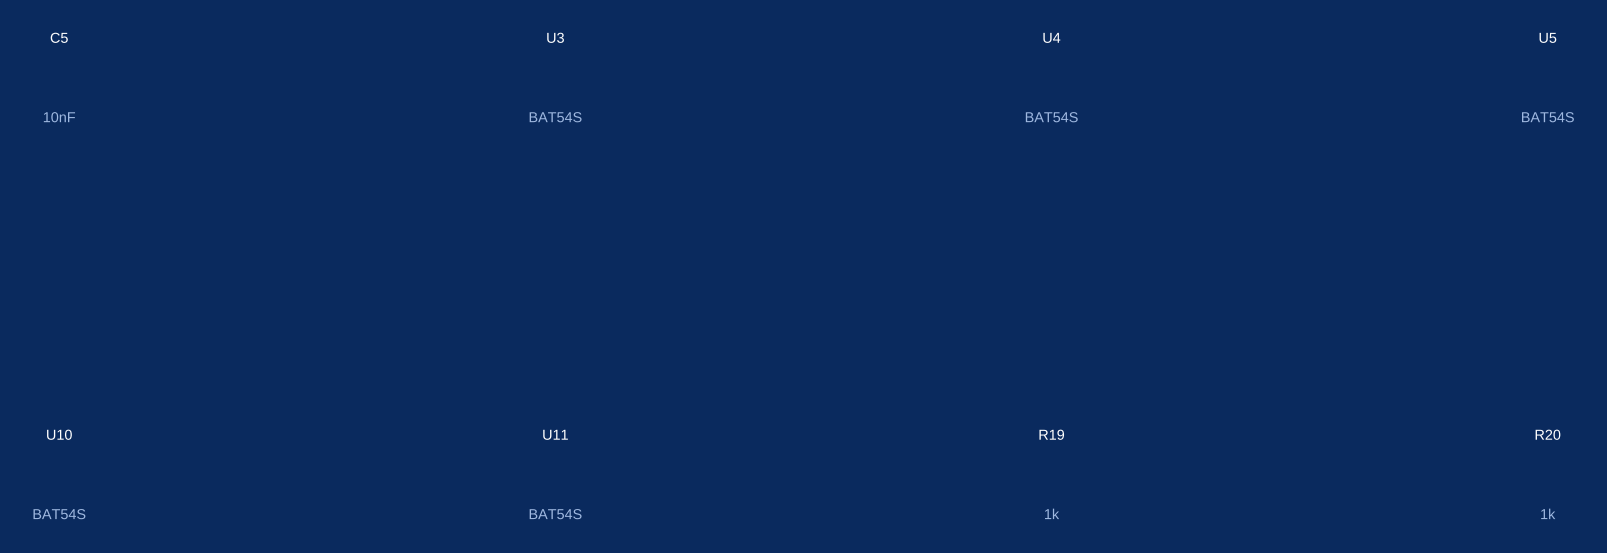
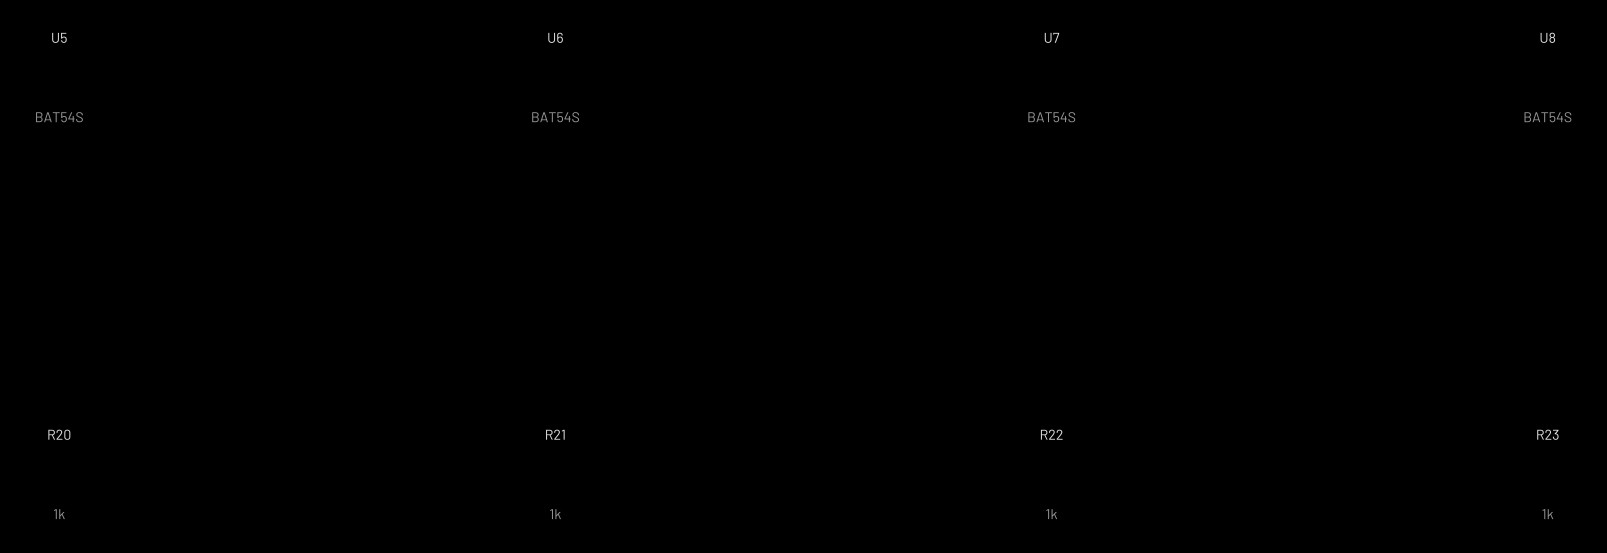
C5 name: C5 (59, 37) -> U5 (59, 37)
U3 name: U3 (555, 37) -> U6 (555, 37)
U4 name: U4 (1051, 37) -> U7 (1051, 37)
U5 name: U5 (1547, 37) -> U8 (1547, 37)
C5 value: 10nF (59, 117) -> BAT54S (59, 117)
U10 name: U10 (59, 434) -> R20 (59, 434)
U11 name: U11 (555, 434) -> R21 (555, 434)
R19 name: R19 (1051, 434) -> R22 (1051, 434)
R20 name: R20 (1547, 434) -> R23 (1547, 434)
U10 value: BAT54S (59, 514) -> 1k (59, 514)
U11 value: BAT54S (555, 514) -> 1k (555, 514)

